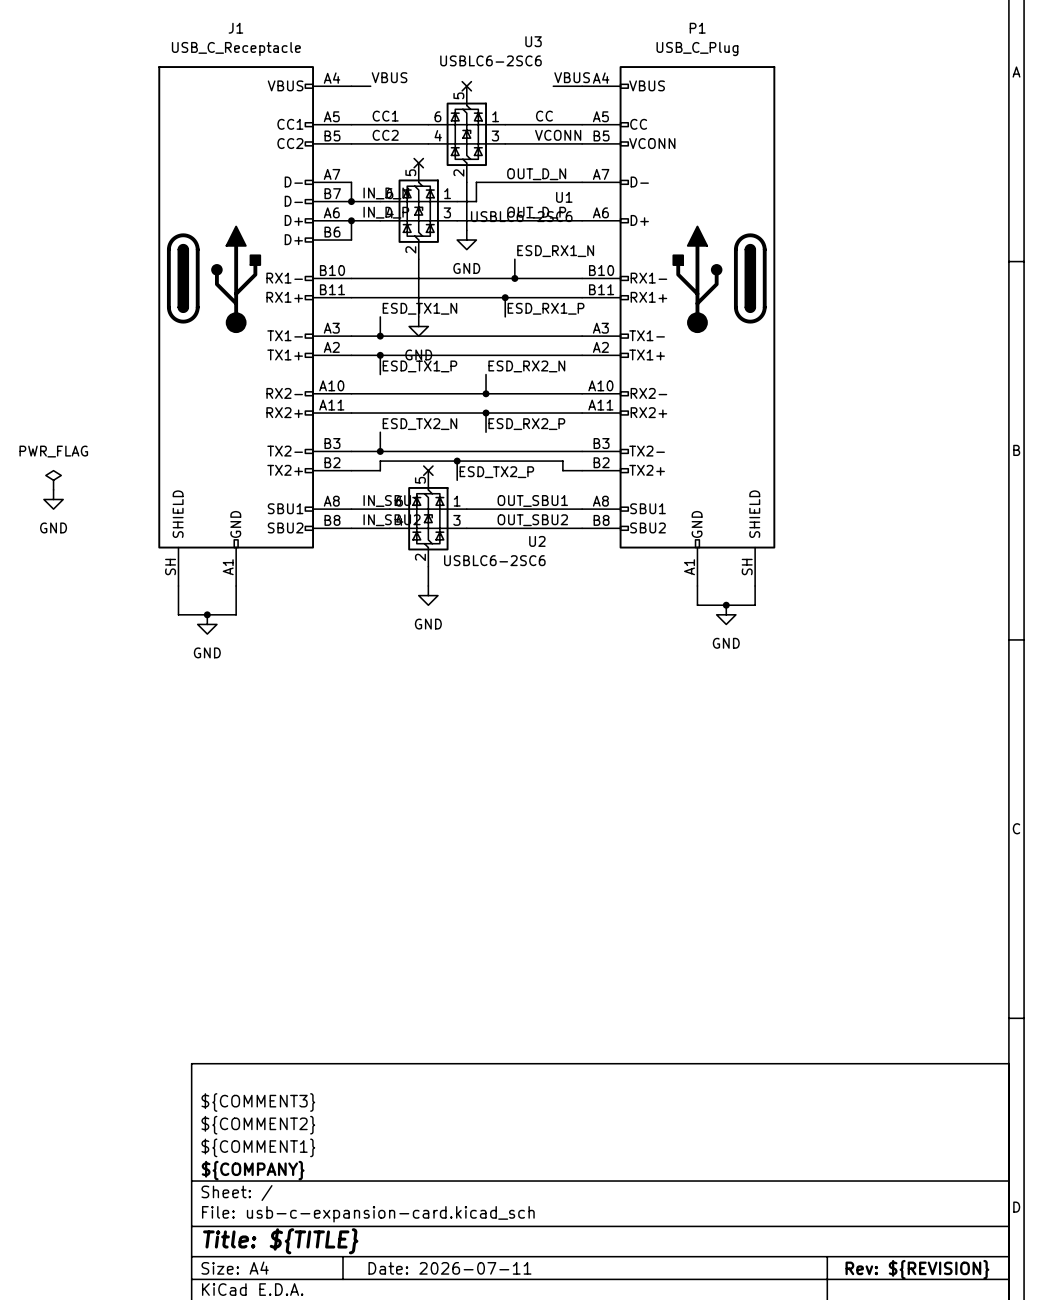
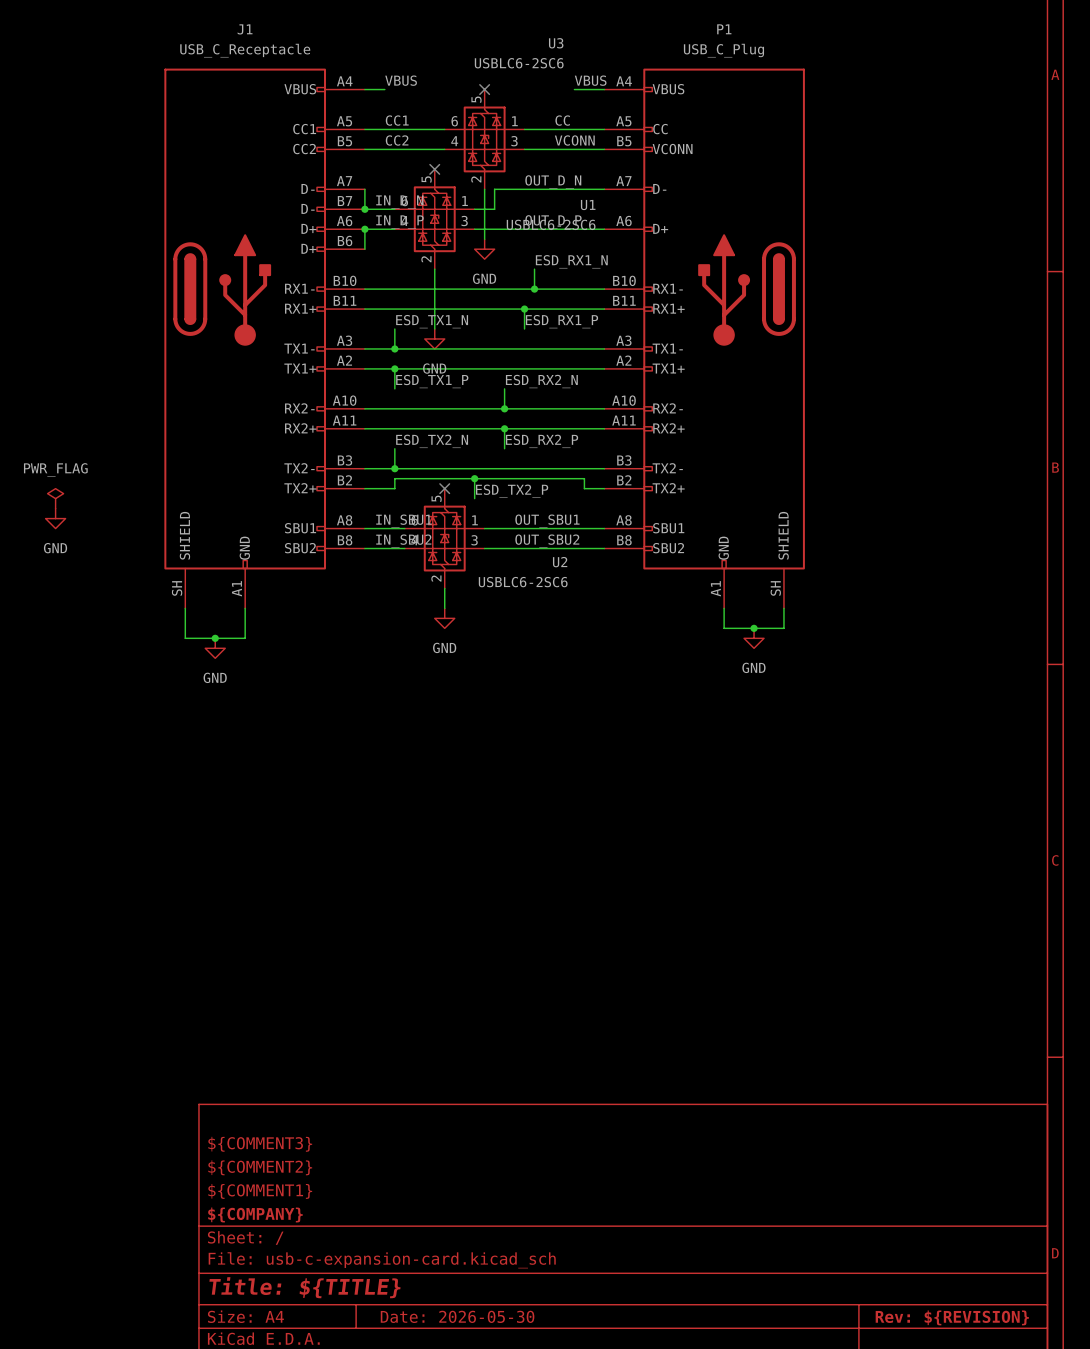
title block: Date: 2026-07-11 (449, 1268) -> Date: 2026-05-30 (457, 1316)

